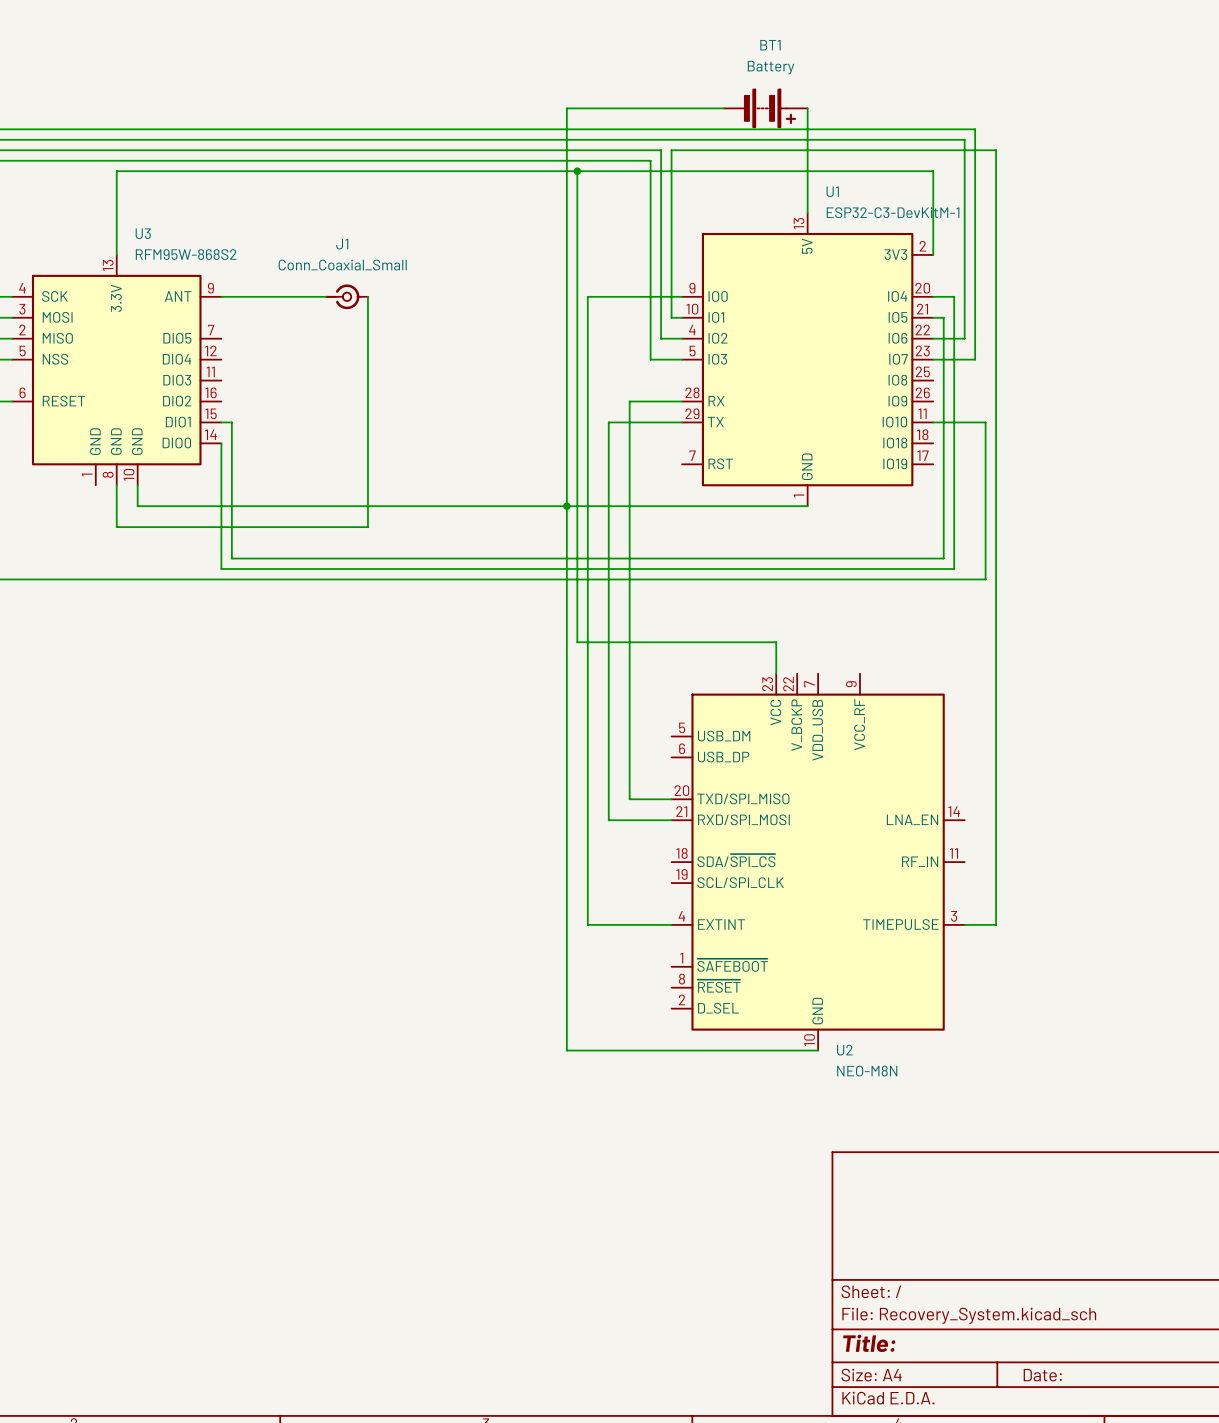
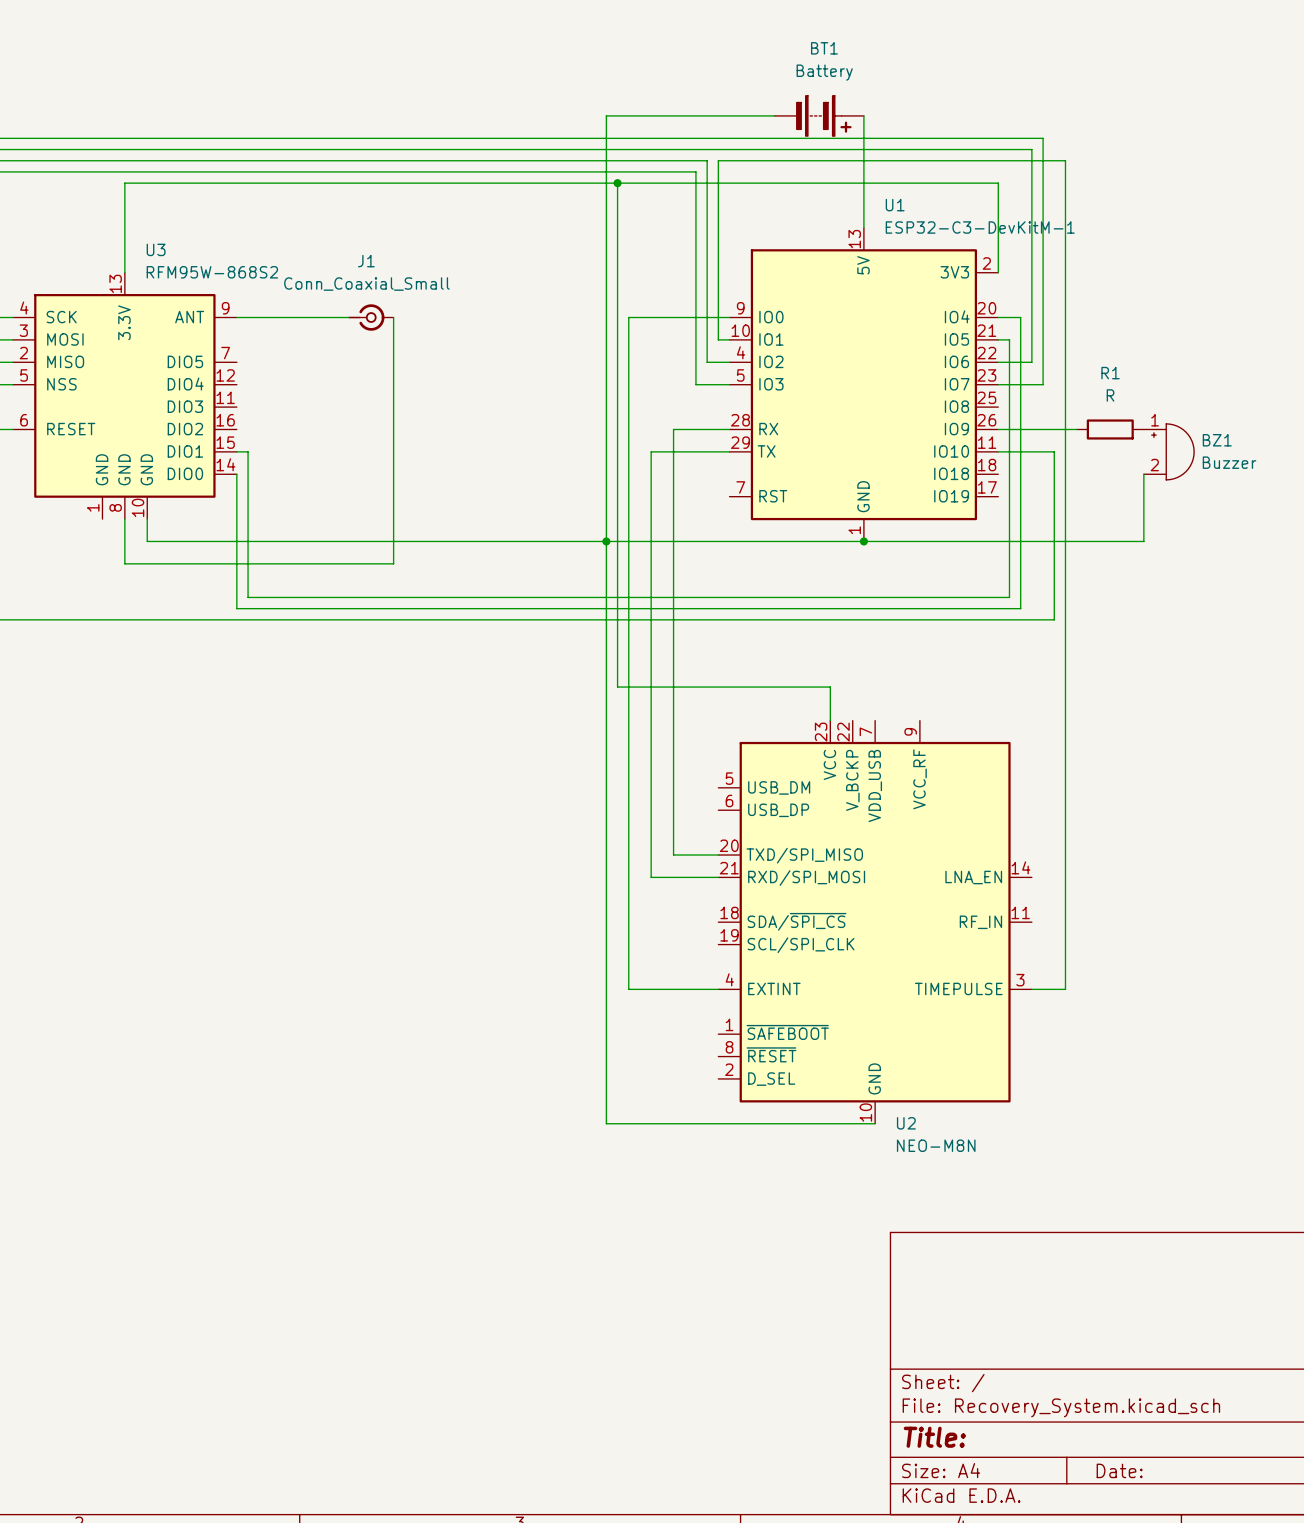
wire: none -> (998, 429) (1076, 429)
R1: none -> R (1110, 429)
BZ1: none -> Buzzer (1169, 451)
wire: none -> (1143, 474) (1143, 541) (863, 541)
junction: none -> (863, 541)

